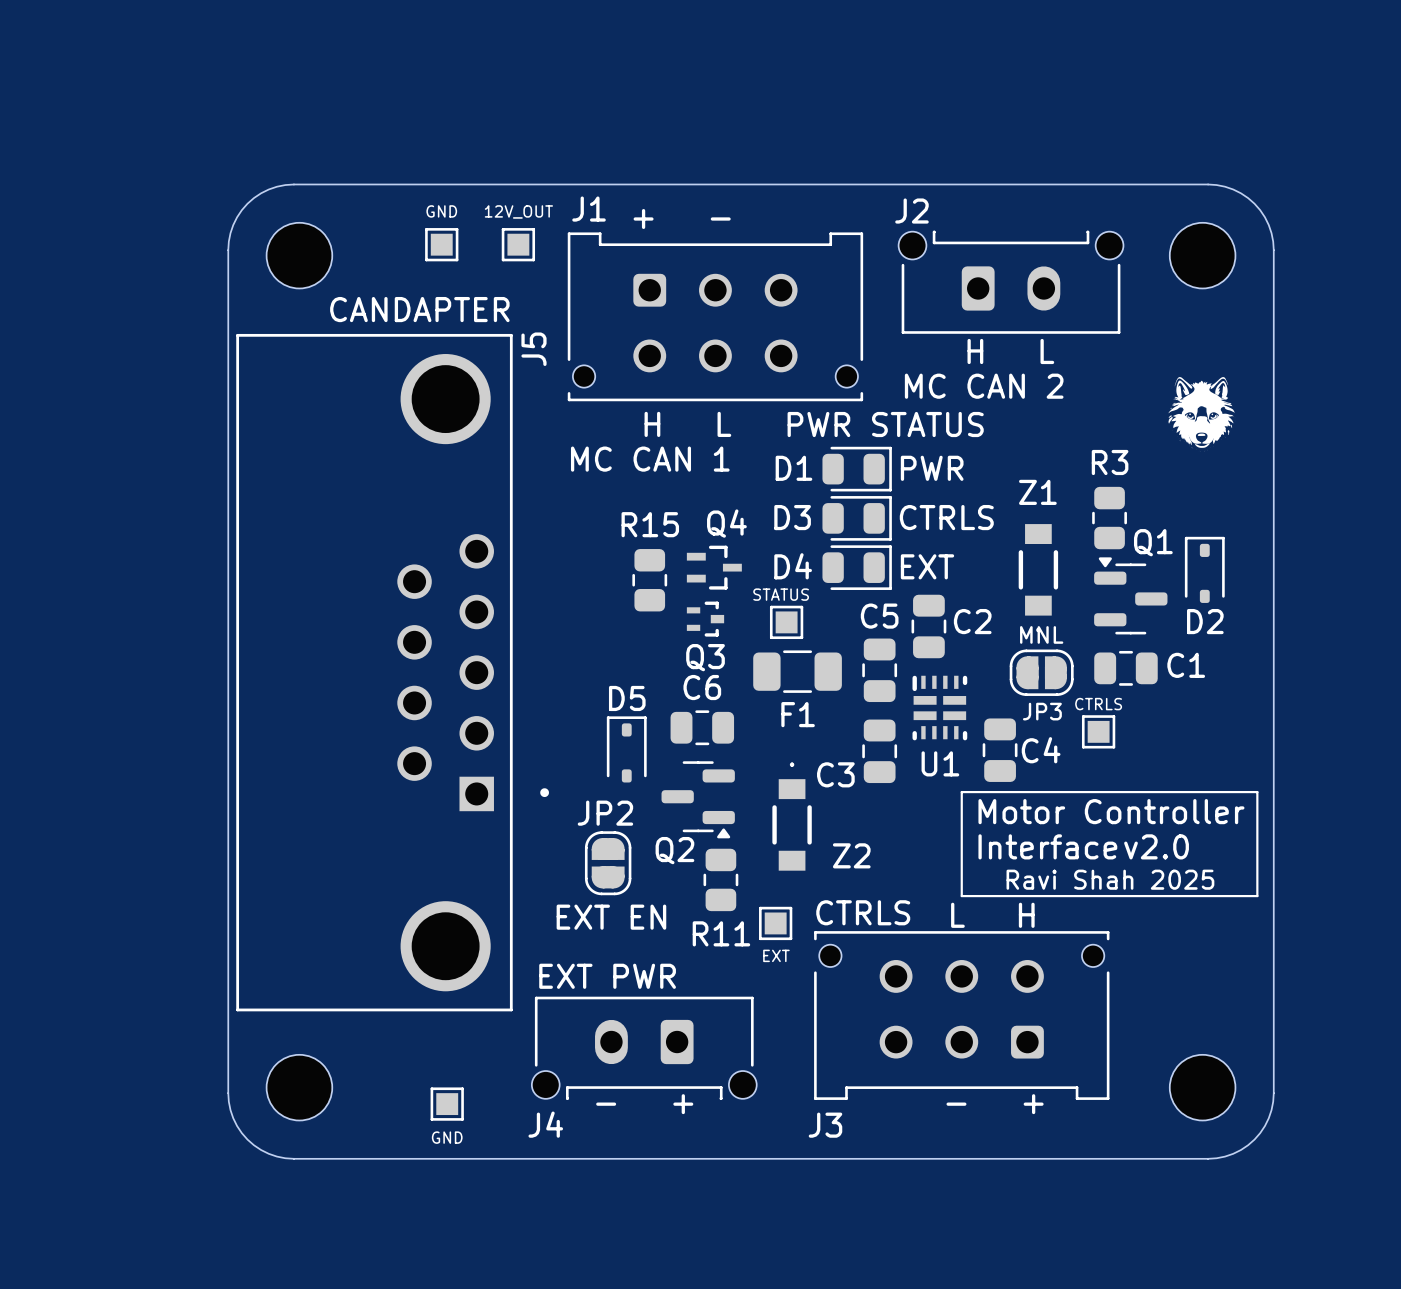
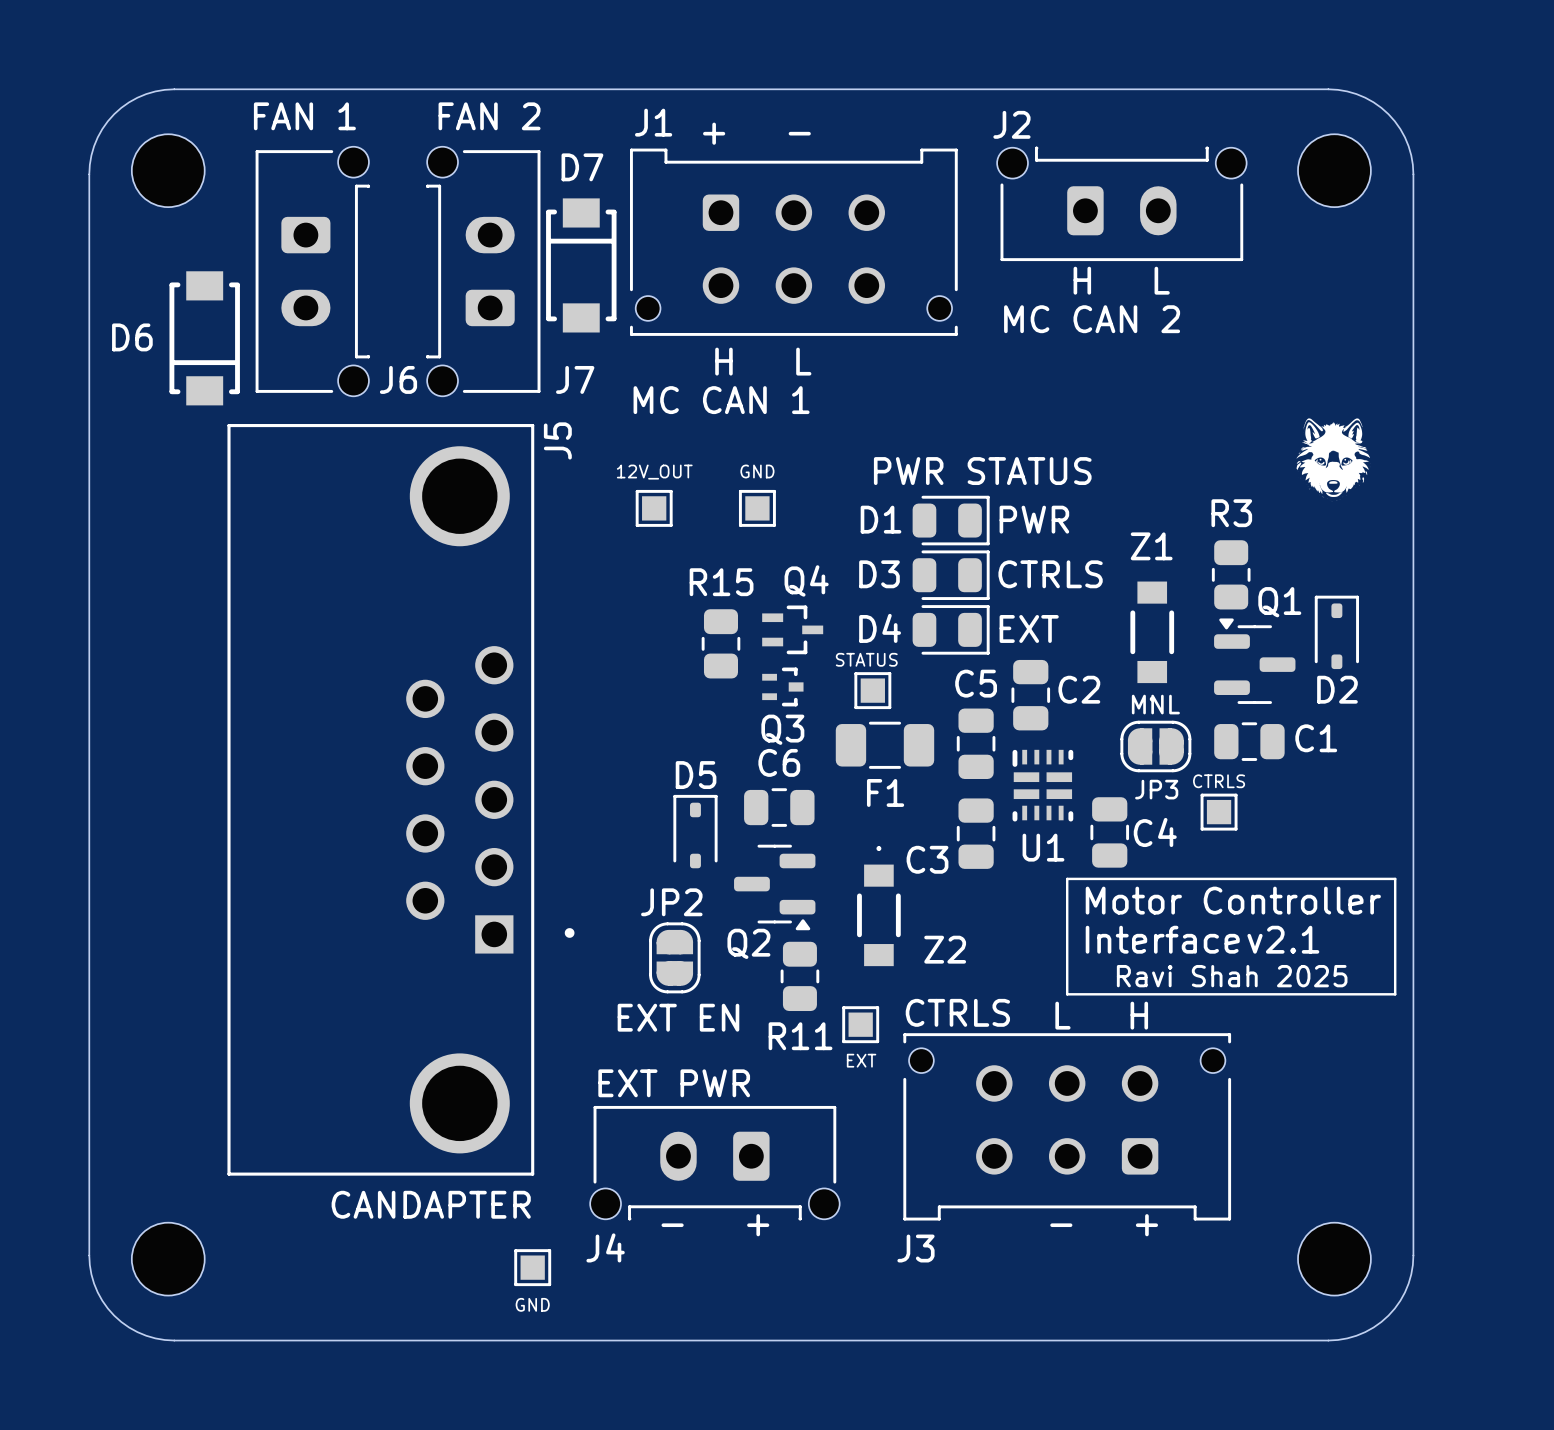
text position: + - (682, 219) -> + - (756, 133)
D7: none -> (581, 265)
J6: none -> FAN 1 (312, 271)
J7: none -> FAN 2 (483, 271)
part position: (441, 244) -> (757, 508)
part position: (518, 244) -> (654, 508)
board edge: (1273, 250) (1268, 225) (1254, 203) (1233, 189) (1208, 184) (285, 185) (261, 193) (241, 210) (230, 233) (228, 250) (228, 1093) (233, 1118) (241, 1133) (253, 1145) (276, 1156) (293, 1158) (1208, 1158) (1233, 1153) (1254, 1139) (1268, 1118) (1273, 1093) -> (1413, 277) (1413, 174) (1408, 146) (1394, 121) (1381, 107) (1356, 94) (1337, 89) (164, 89) (137, 97) (114, 114) (97, 137) (89, 164) (89, 1255) (91, 1274) (97, 1292) (107, 1308) (121, 1321) (146, 1335) (174, 1340) (1337, 1339) (1356, 1335) (1373, 1327) (1388, 1315) (1400, 1300) (1408, 1283) (1412, 1265) (1413, 1212)
part position: (299, 255) -> (168, 170)
part position: (1202, 255) -> (1334, 170)
J2 position: (1011, 282) -> (1121, 203)
D6: none -> (204, 338)
J5 value position: CANDAPTER (419, 309) -> CANDAPTER (431, 1204)
J1 position: (715, 316) -> (793, 242)
text position: H L (1010, 351) -> H L (1121, 280)
text position: H L (687, 424) -> H L (763, 361)
J5 position: (392, 672) -> (400, 799)
text: v2.0 (1156, 846) -> v2.1 (1283, 939)
part position: (299, 1087) -> (168, 1259)
part position: (1202, 1087) -> (1334, 1259)
part position: (447, 1104) -> (532, 1267)

